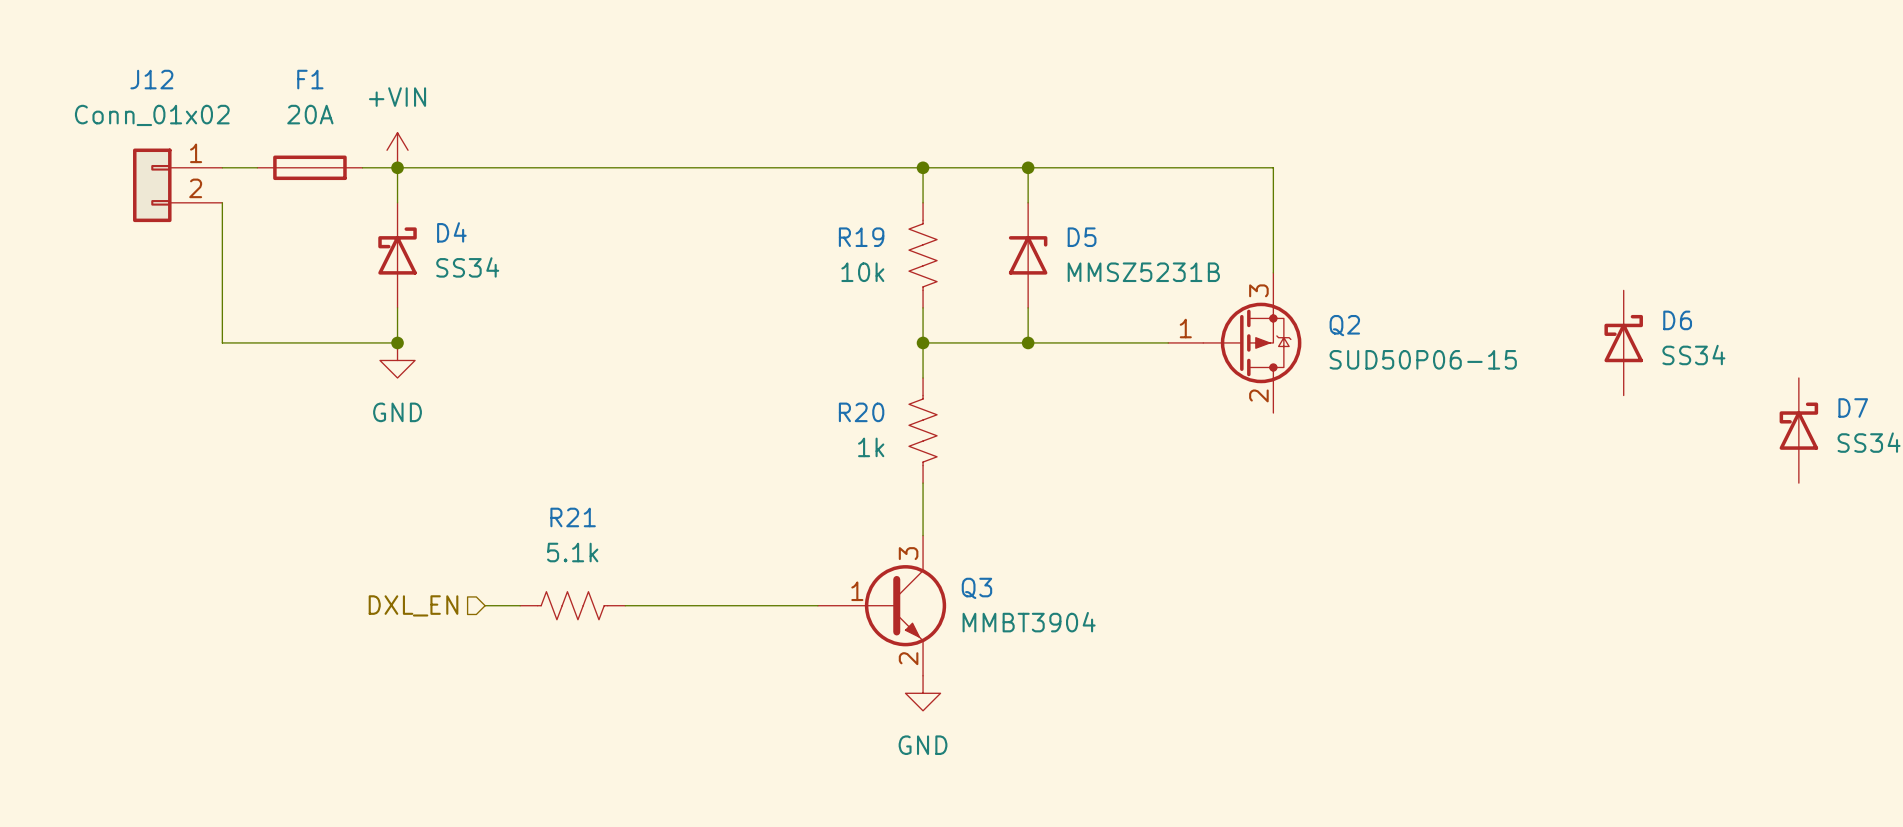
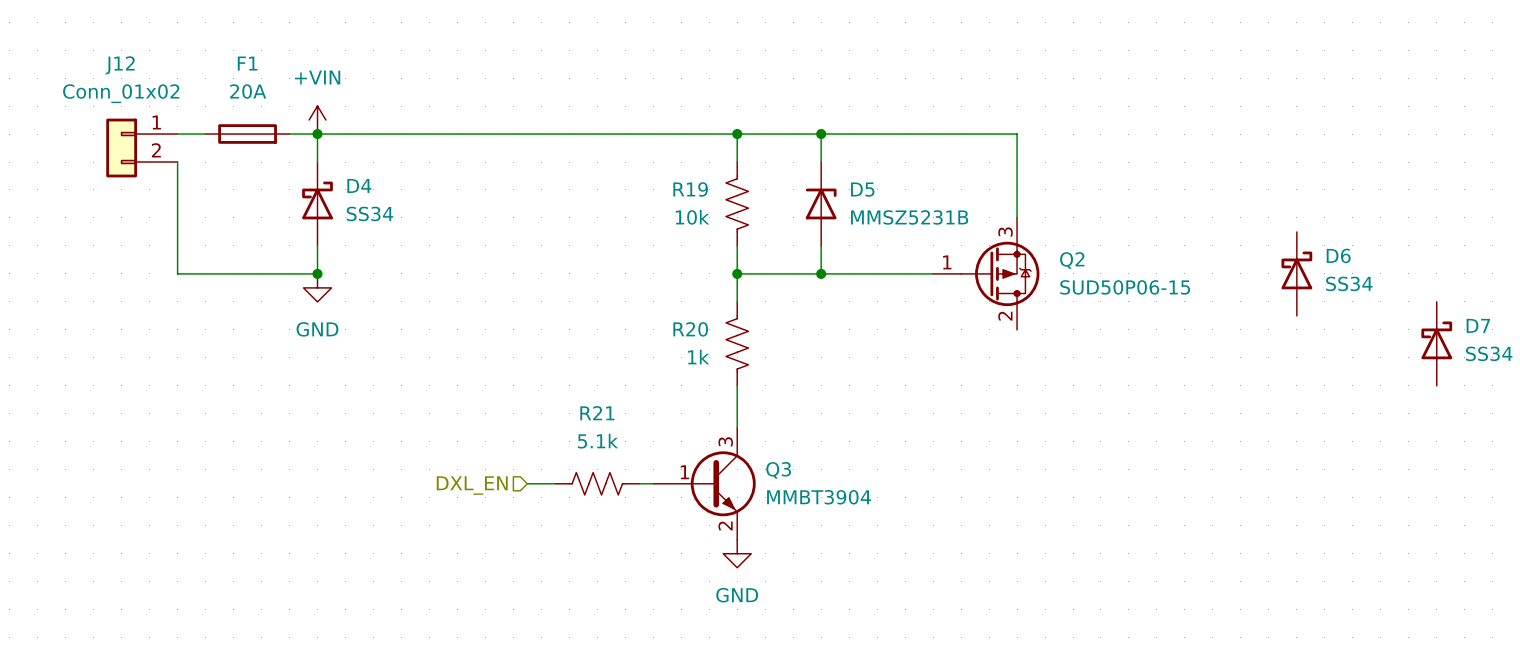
hierarchical label position: DXL_EN (413, 605) -> DXL_EN (472, 485)
wire: (485, 605) (520, 605) -> none
R21 position: (572, 605) -> (597, 483)
wire: (625, 605) (660, 605) -> none
wire: (695, 605) (800, 605) -> none

